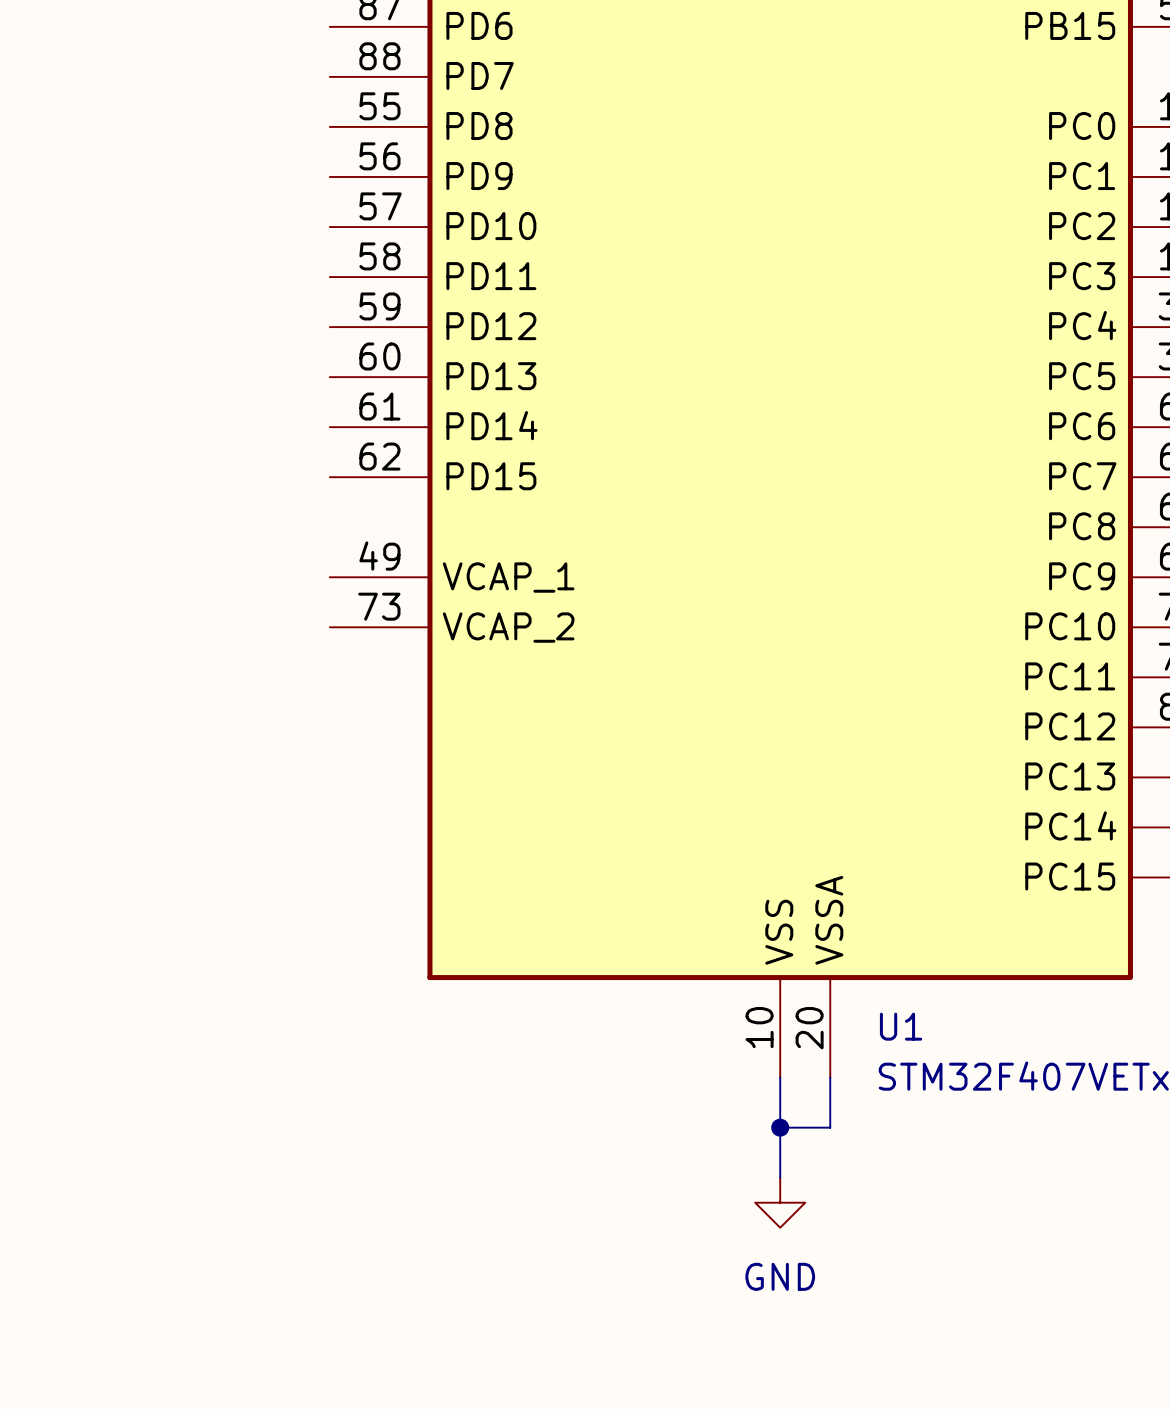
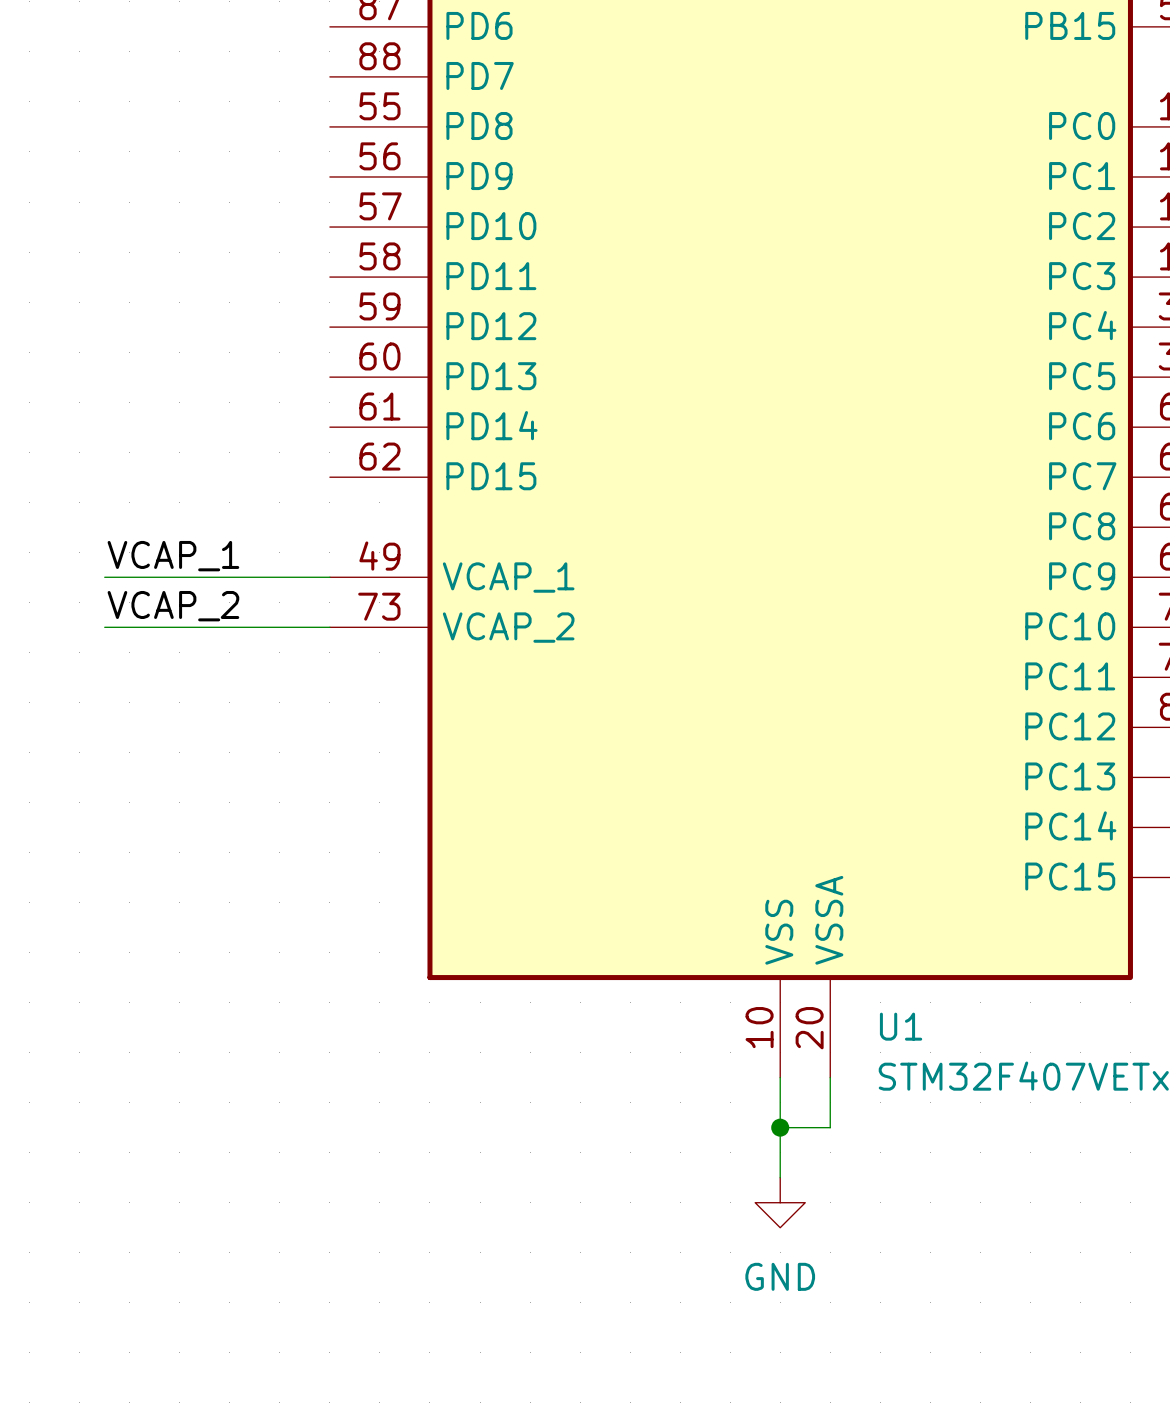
label: none -> VCAP_1 (173, 556)
wire: none -> (104, 577) (329, 577)
label: none -> VCAP_2 (173, 606)
wire: none -> (104, 627) (329, 627)

